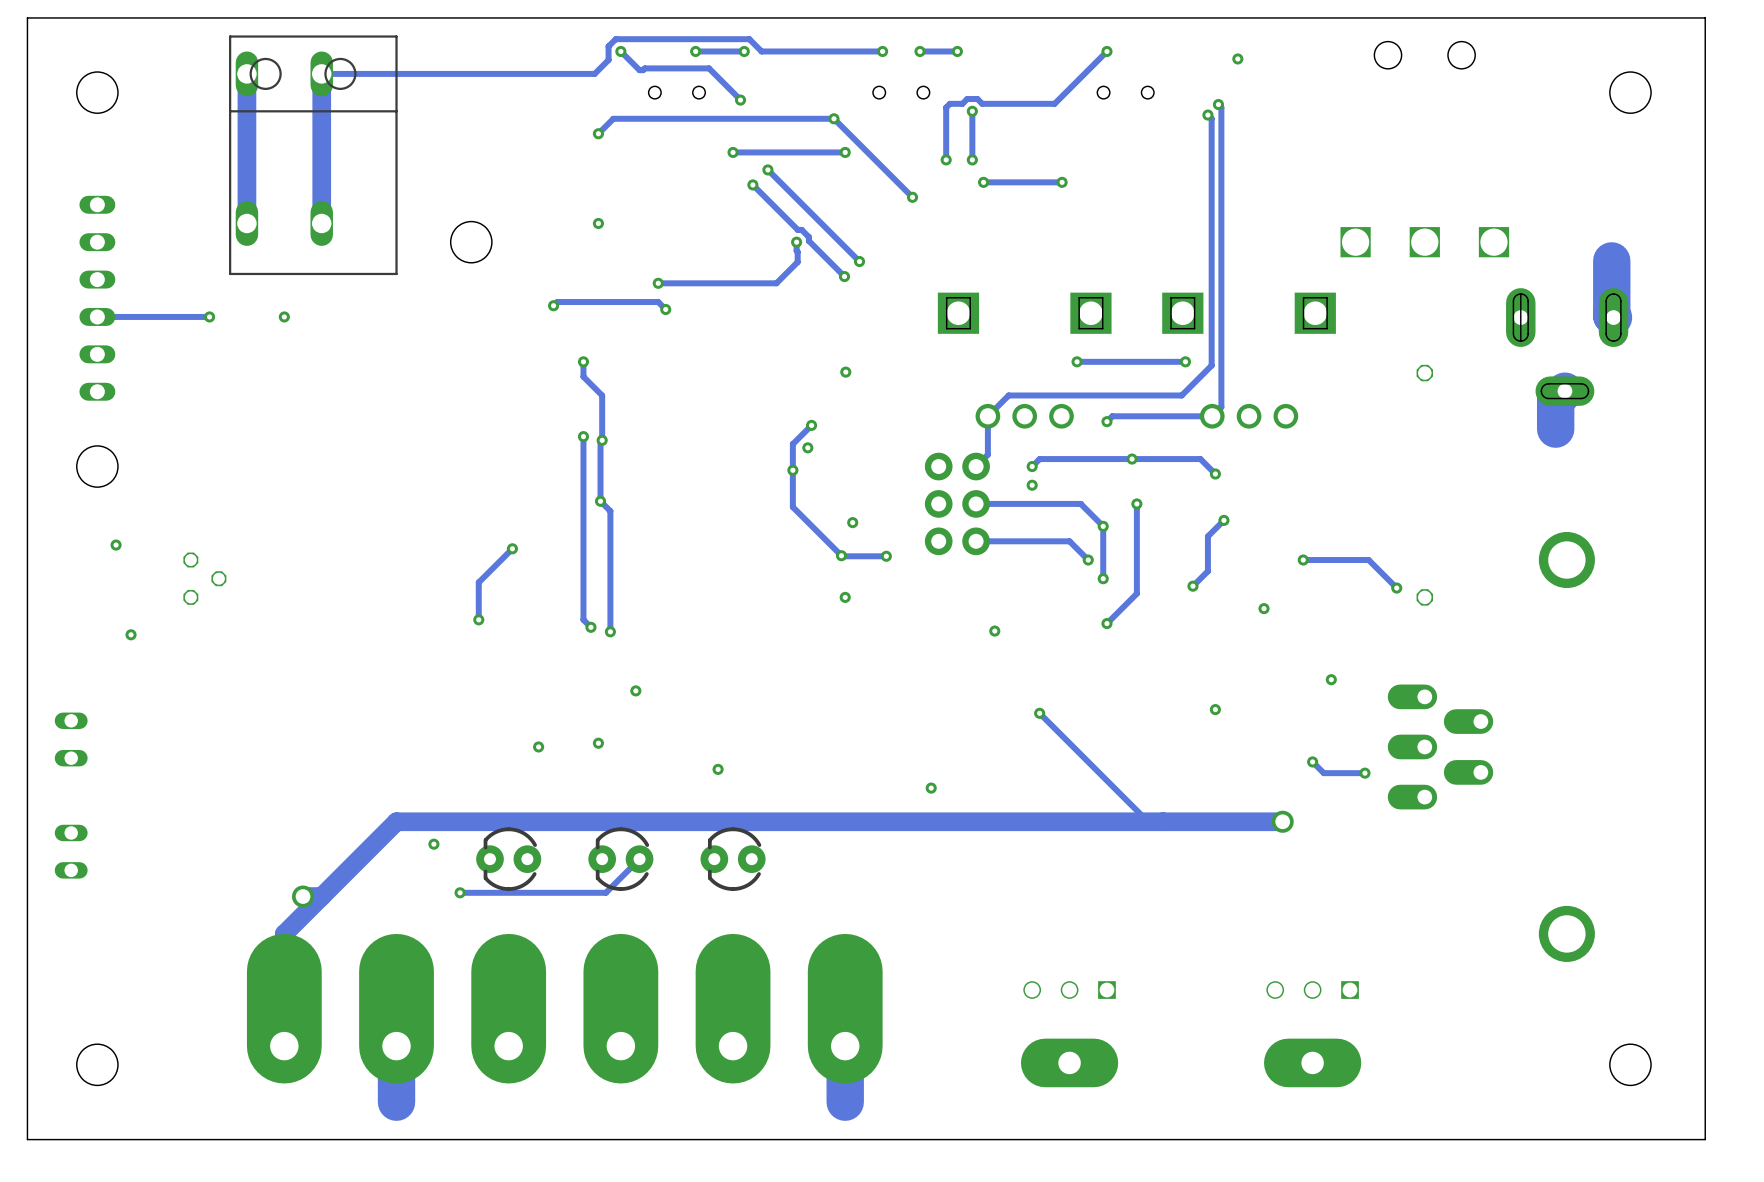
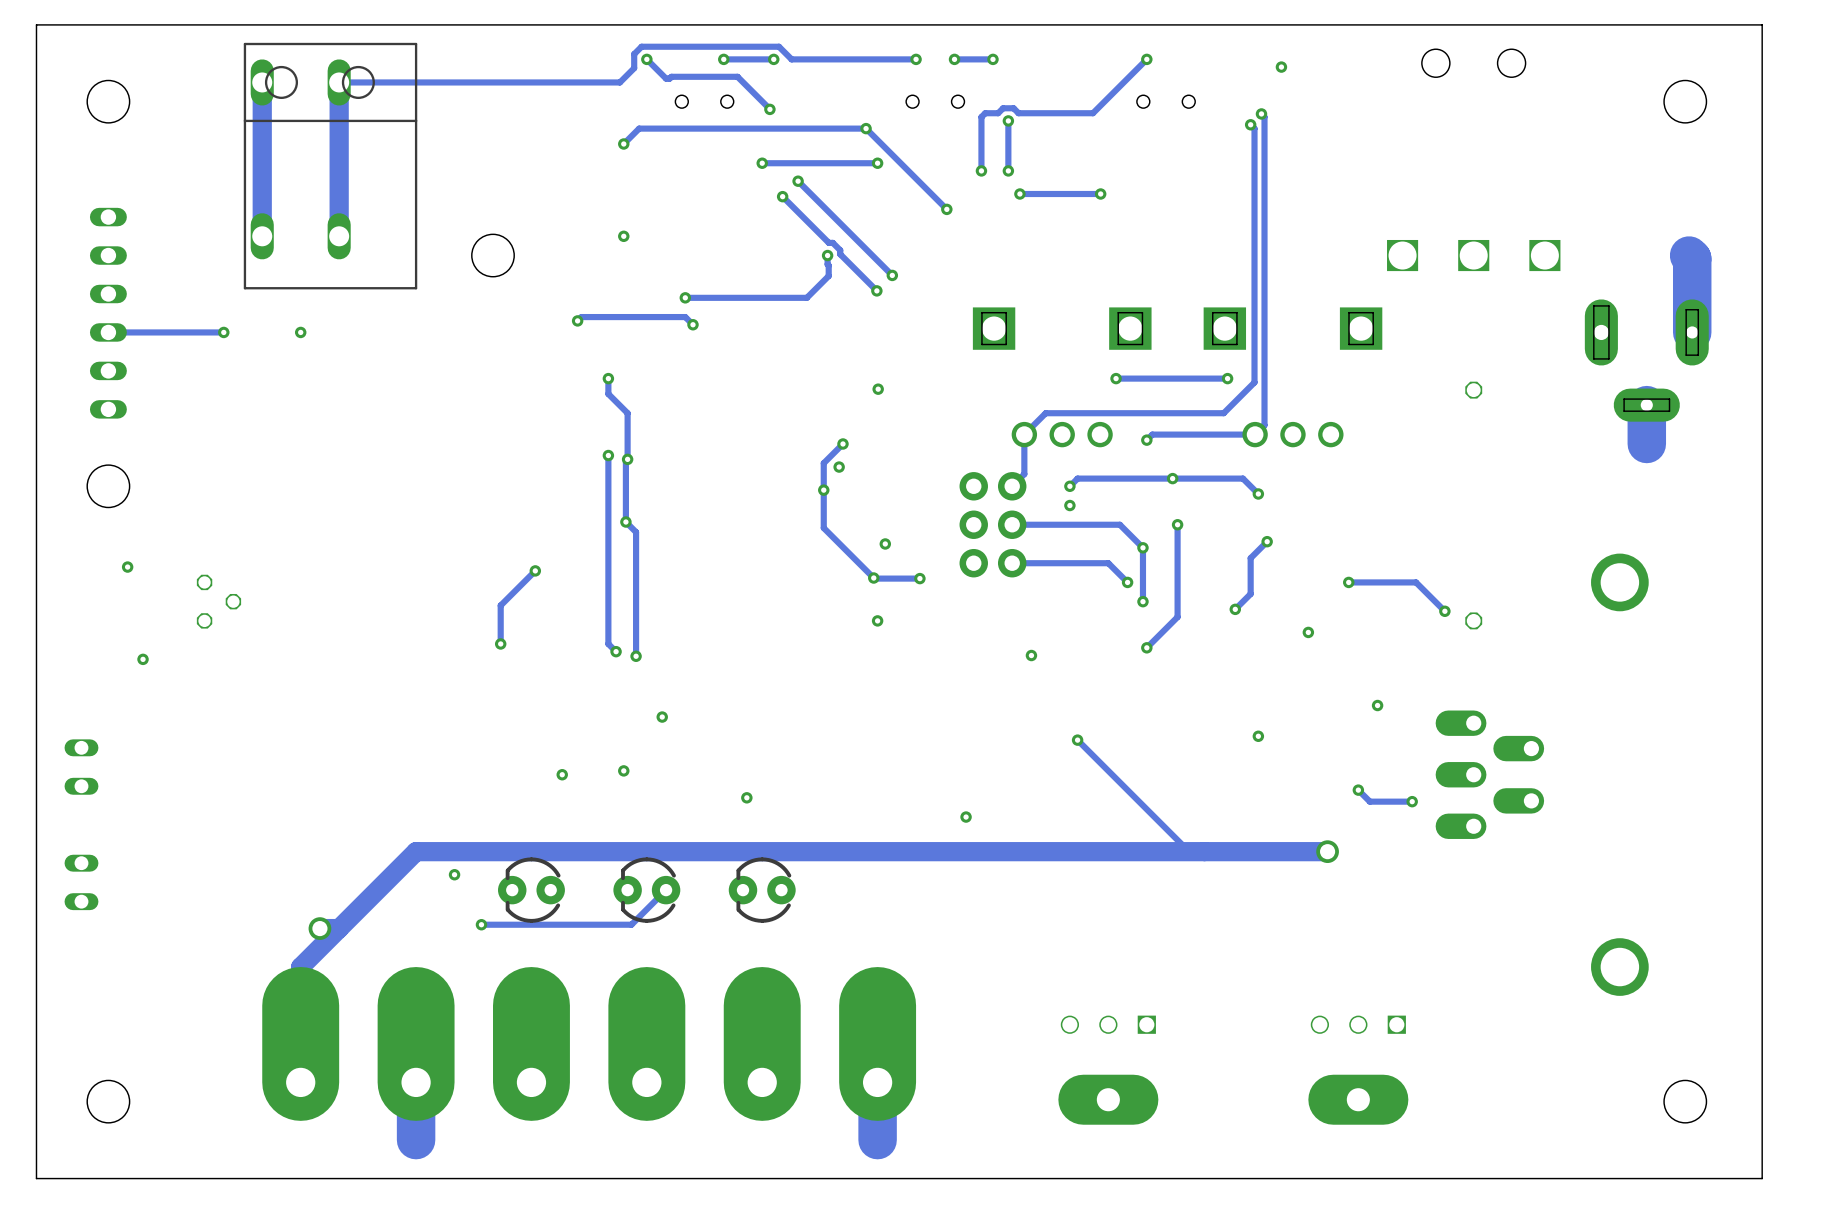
track: none -> (1689, 255) (1692, 258) (1692, 332)
track: (1611, 260) (1611, 315) (1613, 317) -> none
part: none -> (1646, 360)
part: (1567, 347) -> none
track: none -> (1646, 405) (1646, 443)
track: (1564, 391) (1555, 400) (1555, 429) -> none

